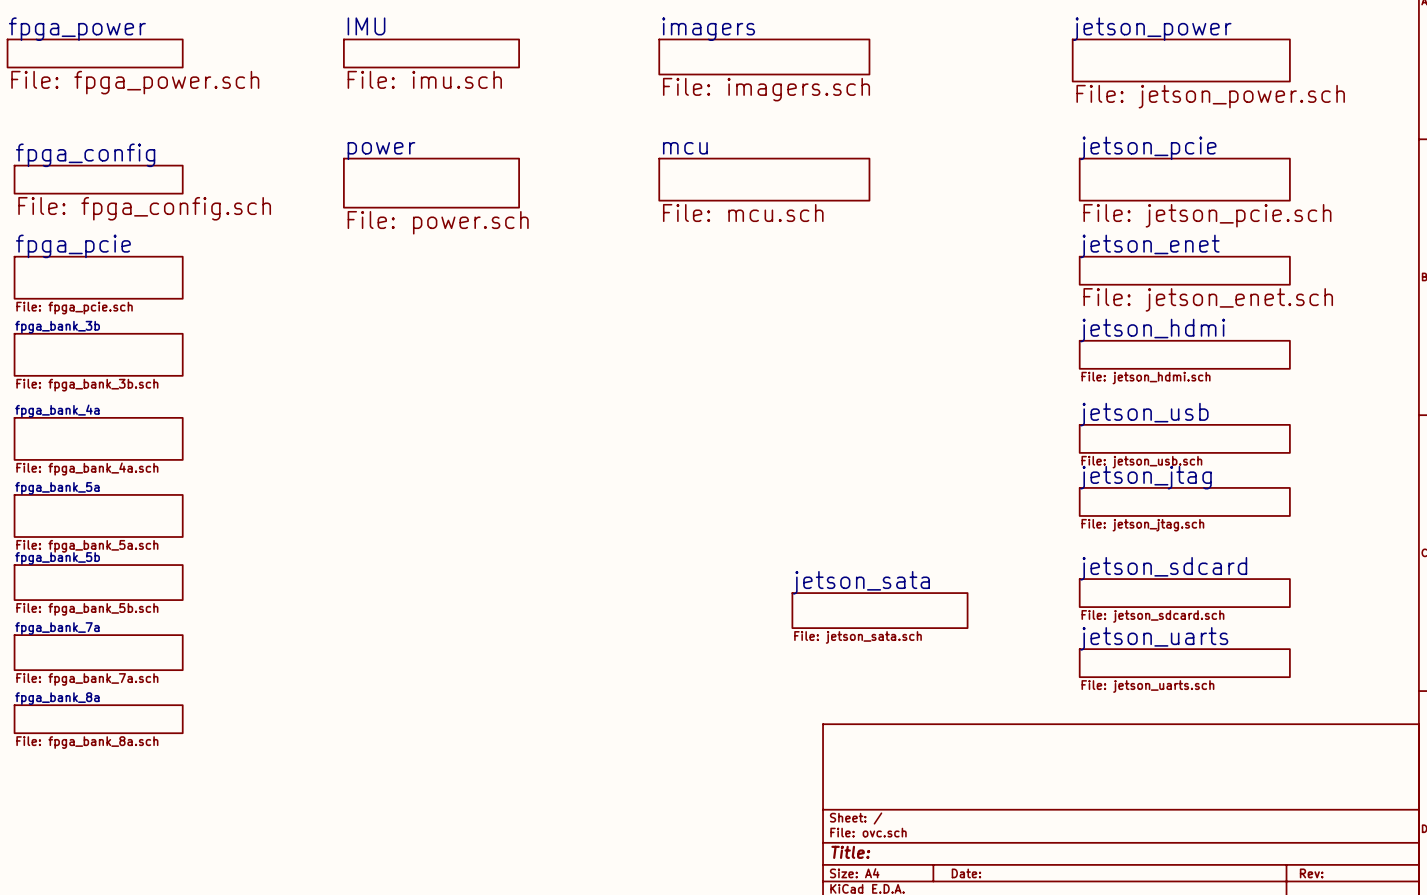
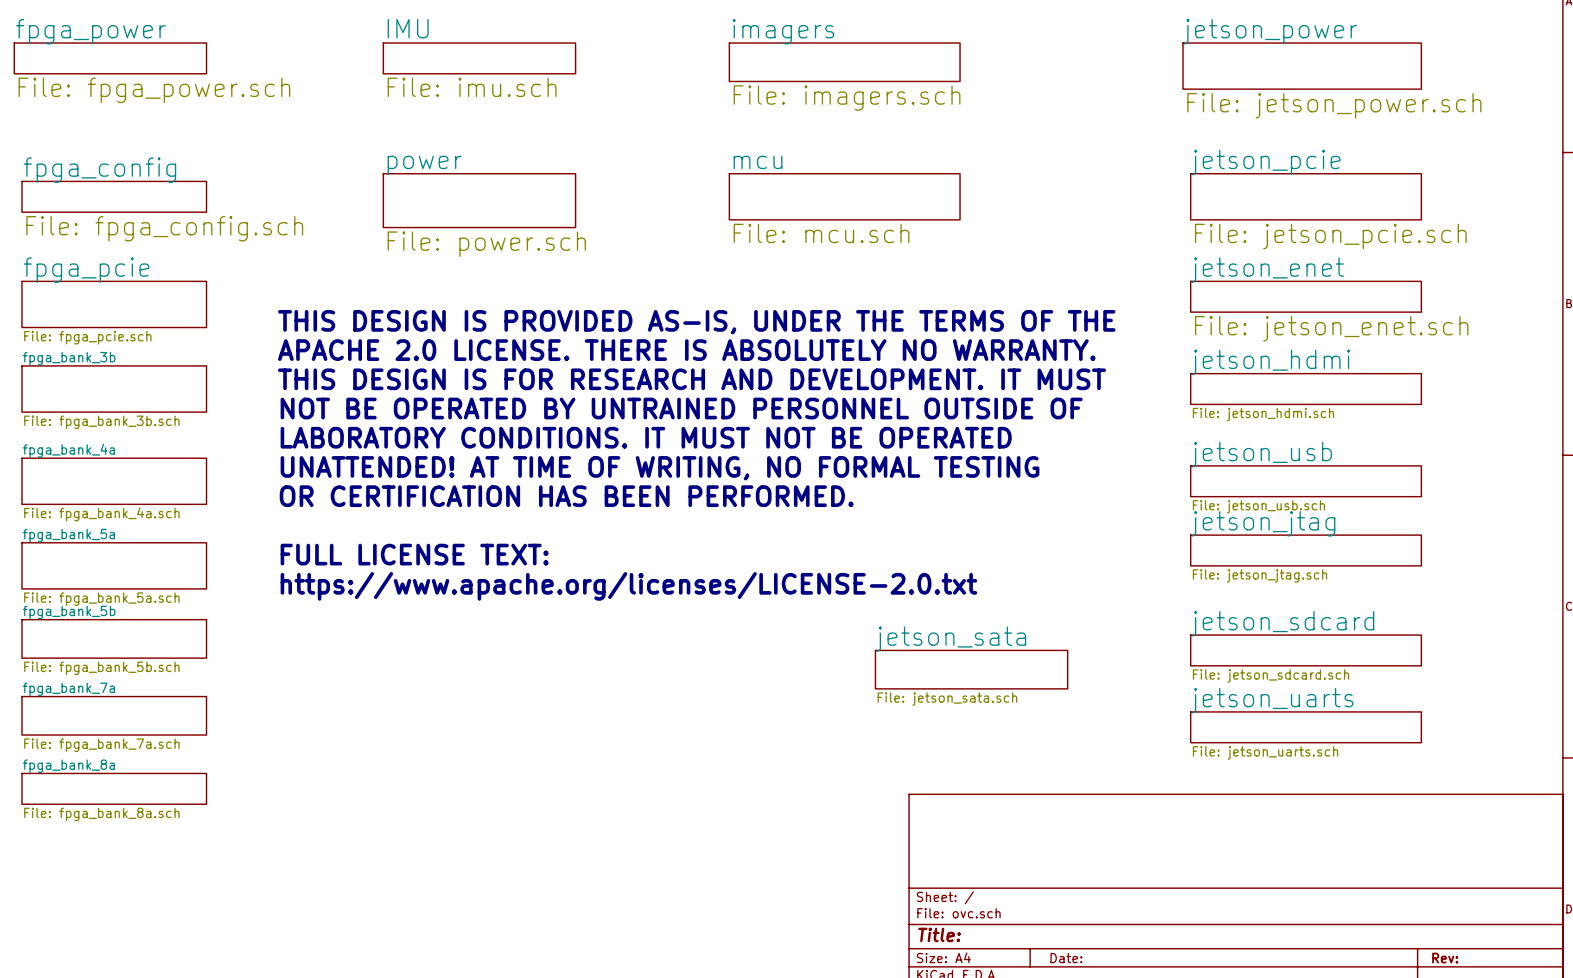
text: none -> THIS DESIGN IS PROVIDED AS-IS, UNDER THE TERMS OF THE (696, 322)
text: none -> APACHE 2.0 LICENSE. THERE IS ABSOLUTELY NO WARRANTY. (686, 350)
text: none -> THIS DESIGN IS FOR RESEARCH AND DEVELOPMENT. IT MUST (691, 379)
text: none -> NOT BE OPERATED BY UNTRAINED PERSONNEL OUTSIDE OF (681, 408)
text: none -> LABORATORY CONDITIONS. IT MUST NOT BE OPERATED (646, 437)
text: none -> UNATTENDED! AT TIME OF WRITING, NO FORMAL TESTING (660, 468)
text: none -> OR CERTIFICATION HAS BEEN PERFORMED. (566, 496)
text: none -> FULL LICENSE TEXT: (414, 554)
text: none -> https://www.apache.org/licenses/LICENSE-2.0.txt (628, 586)

